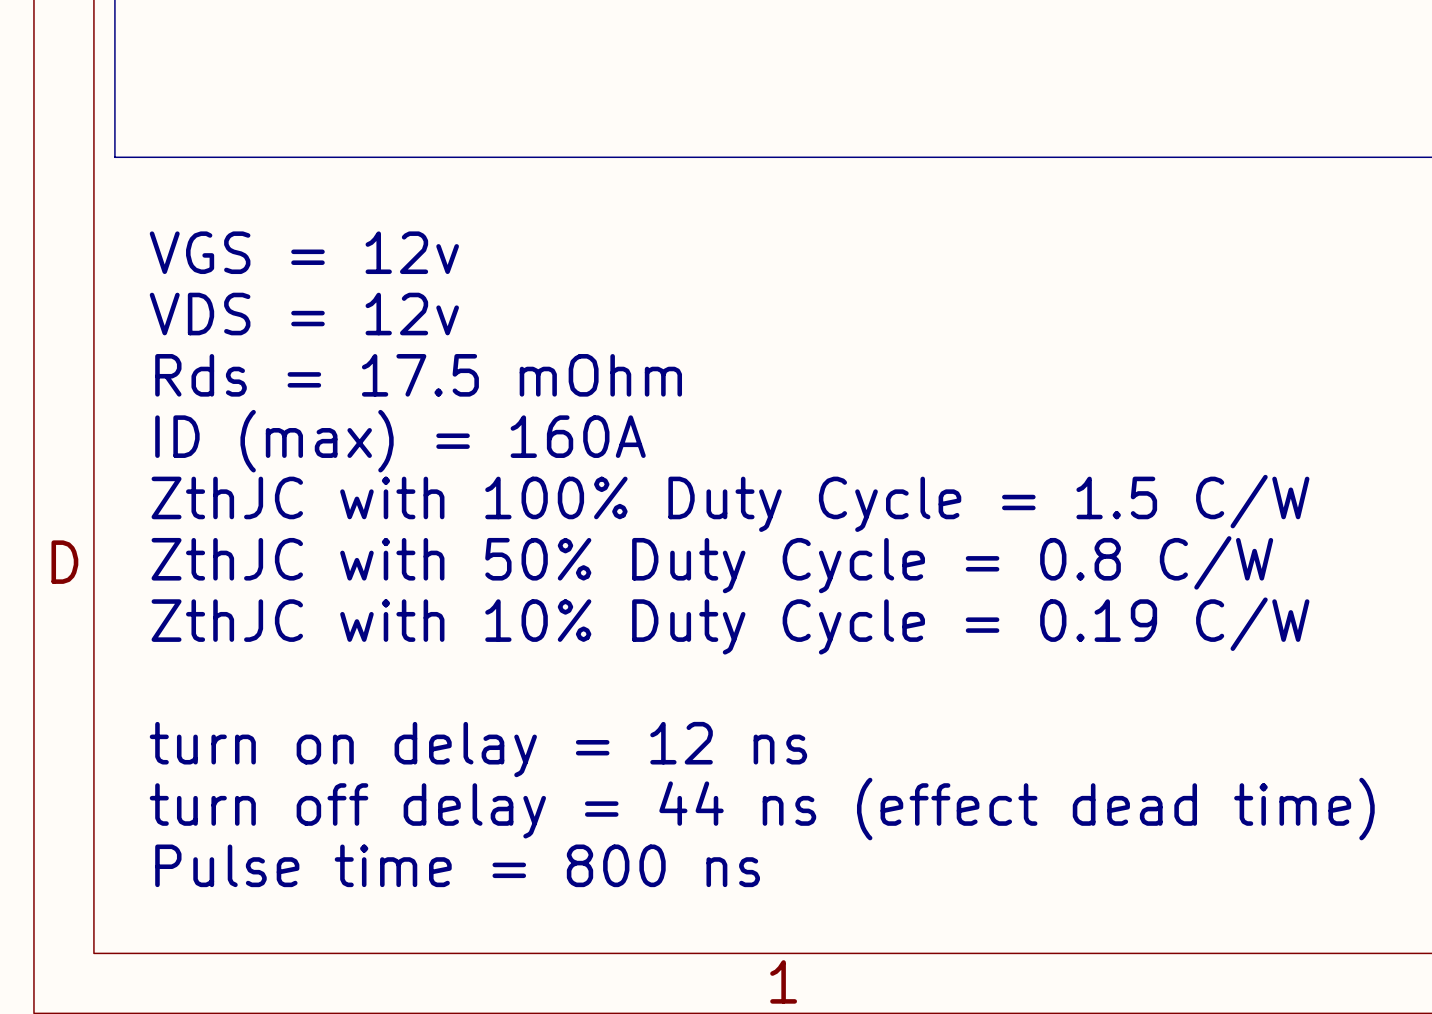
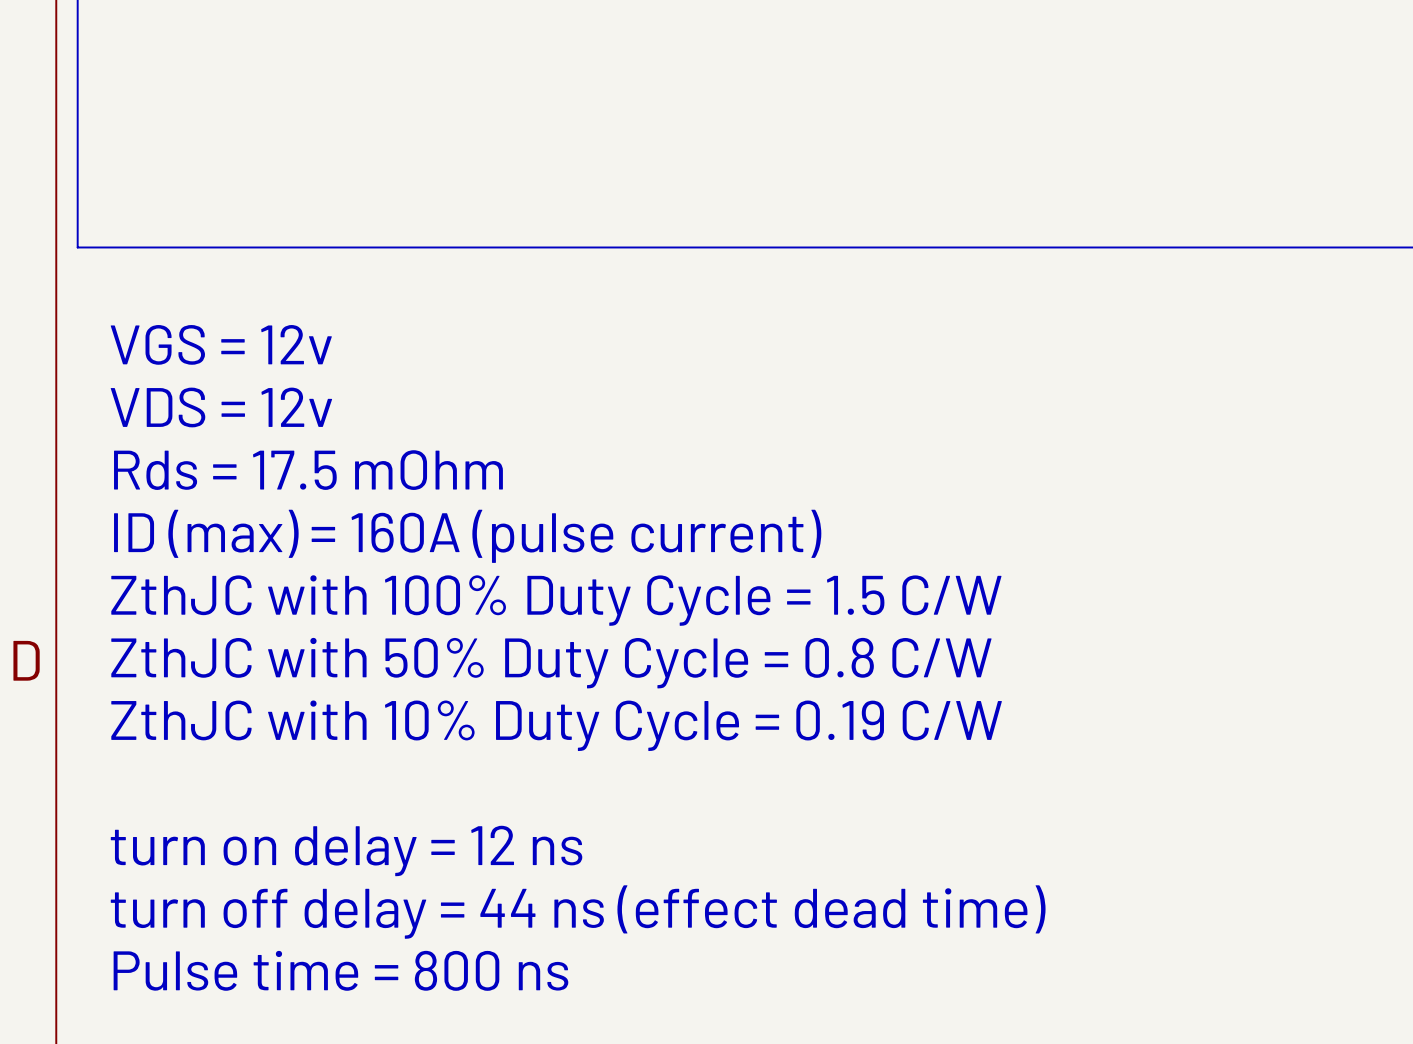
text: ID (max) = 160A (400, 441) -> ID (max) = 160A (pulse current) (467, 536)

